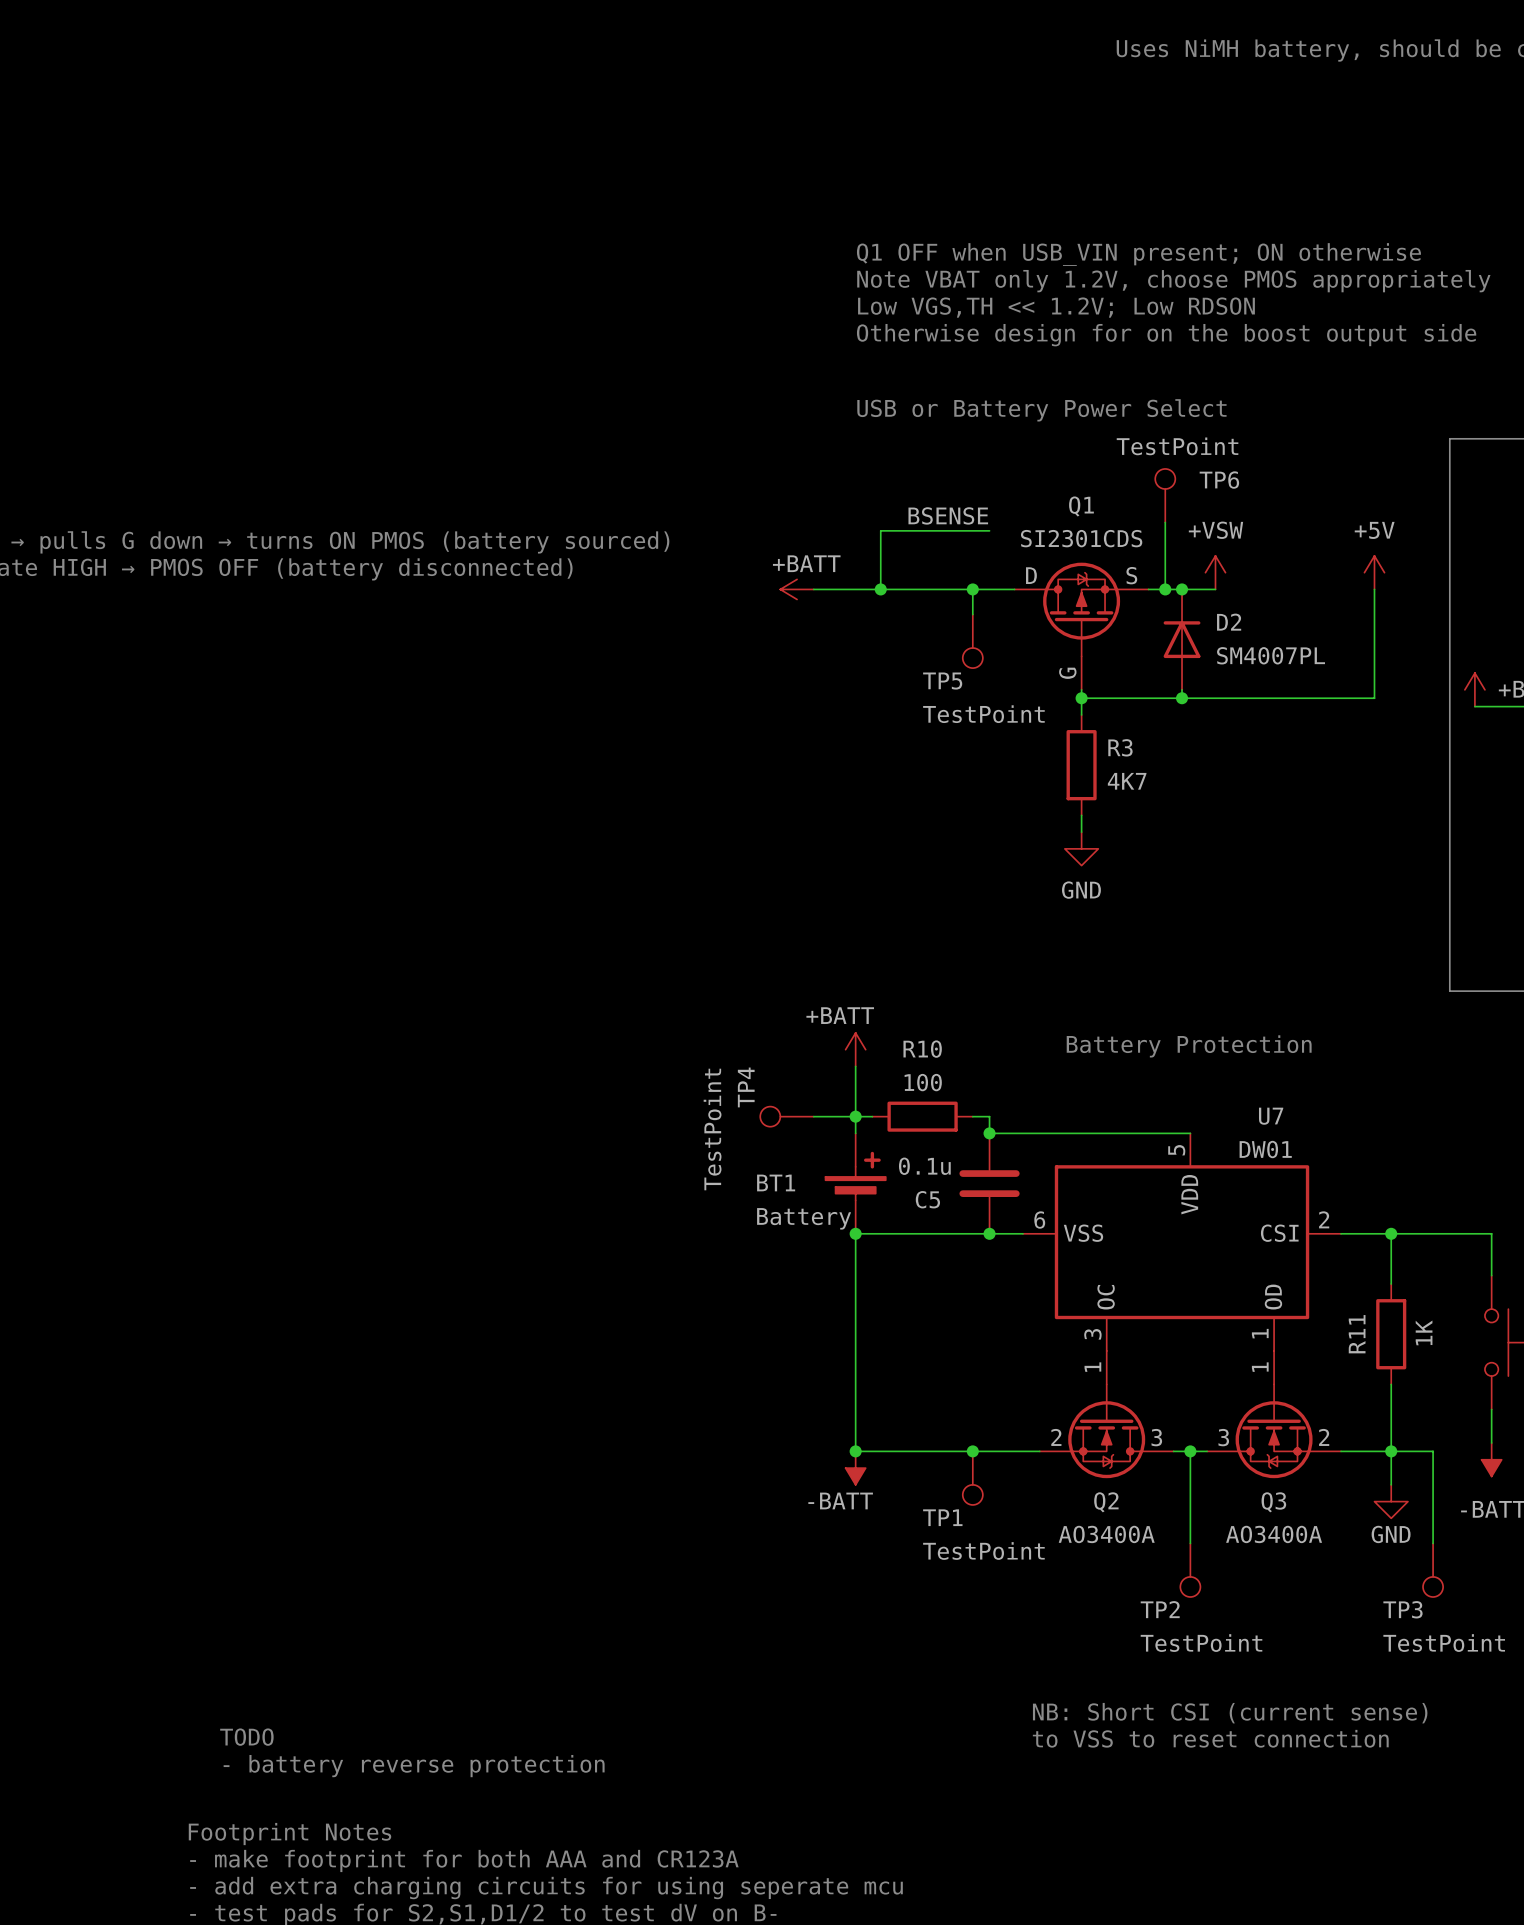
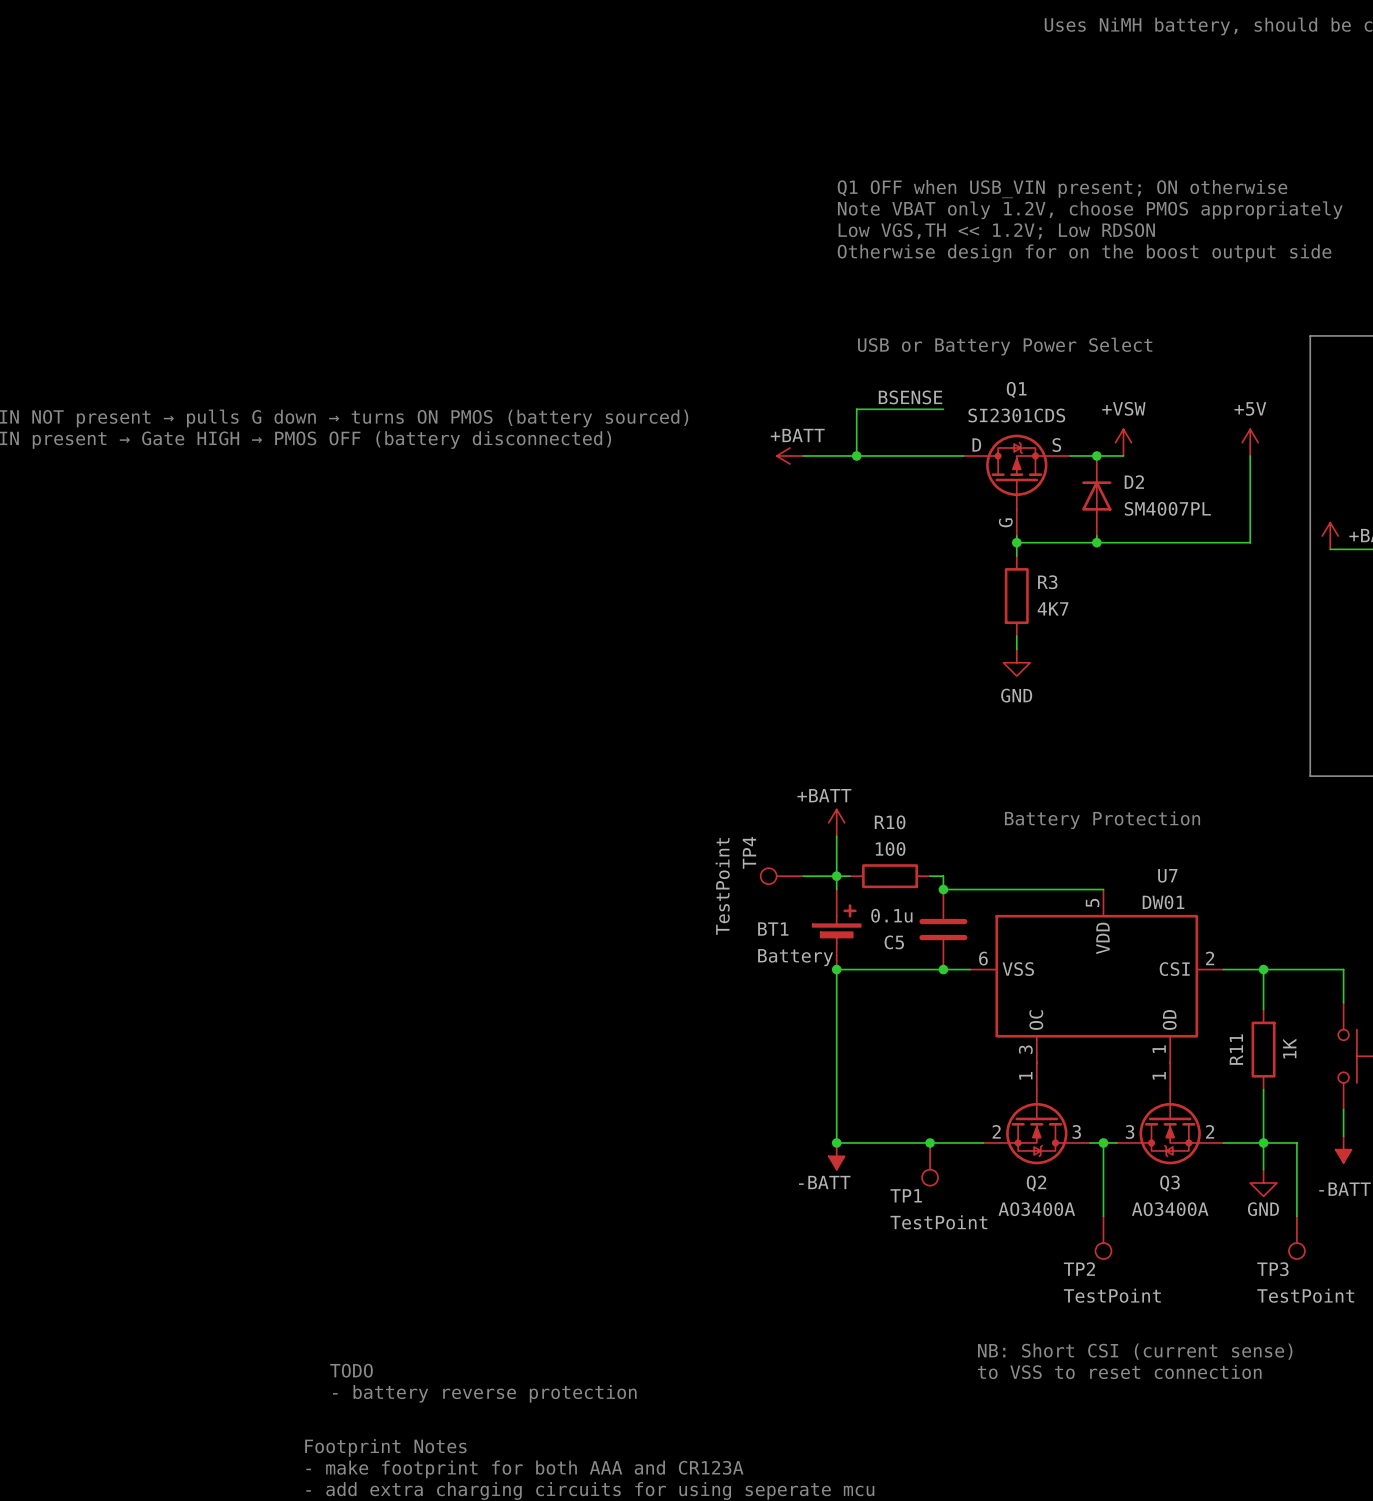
text position: USB or Battery Power Select (1041, 410) -> USB or Battery Power Select (1005, 346)
TP6: TestPoint (1165, 495) -> none
wire: (1165, 522) (1165, 589) -> none
wire: (972, 589) (972, 614) -> none
junction: (972, 589) -> none
junction: (1165, 589) -> none
TP5: TestPoint (972, 641) -> none

